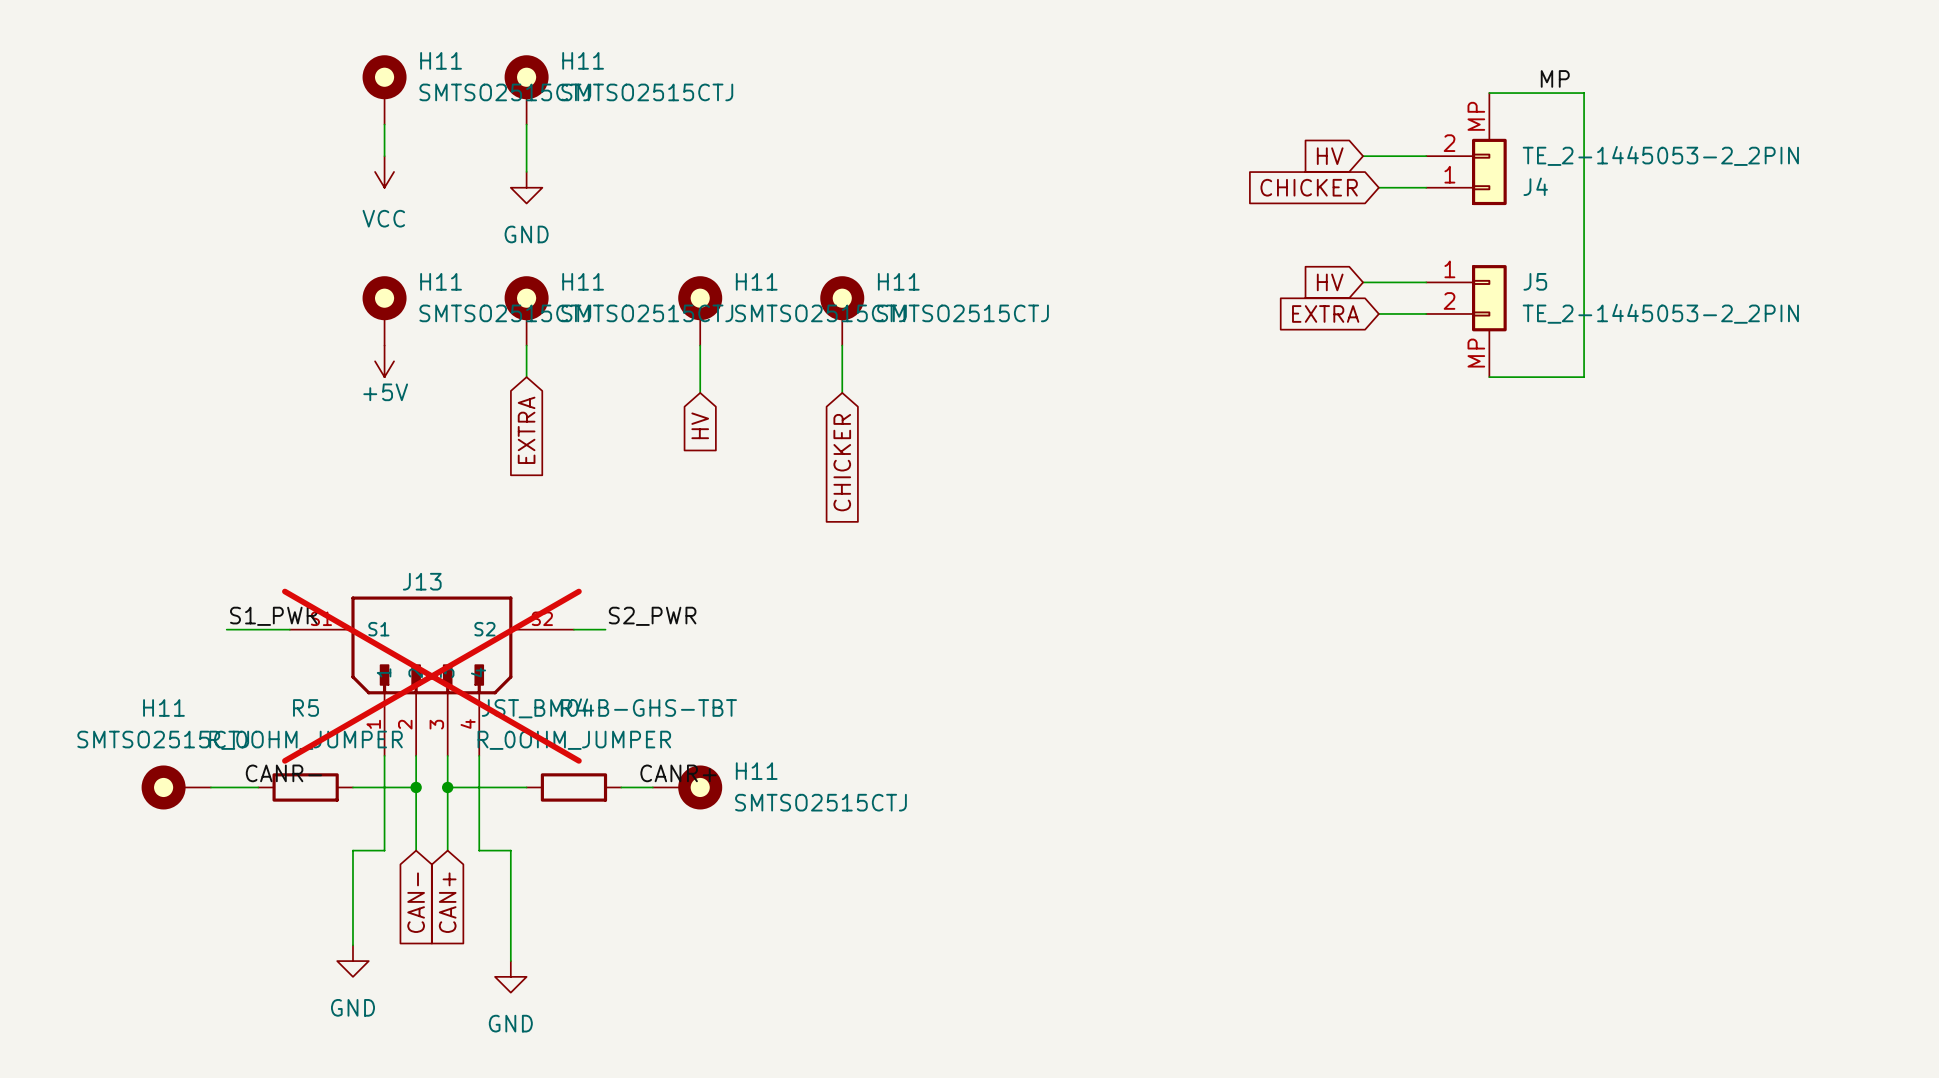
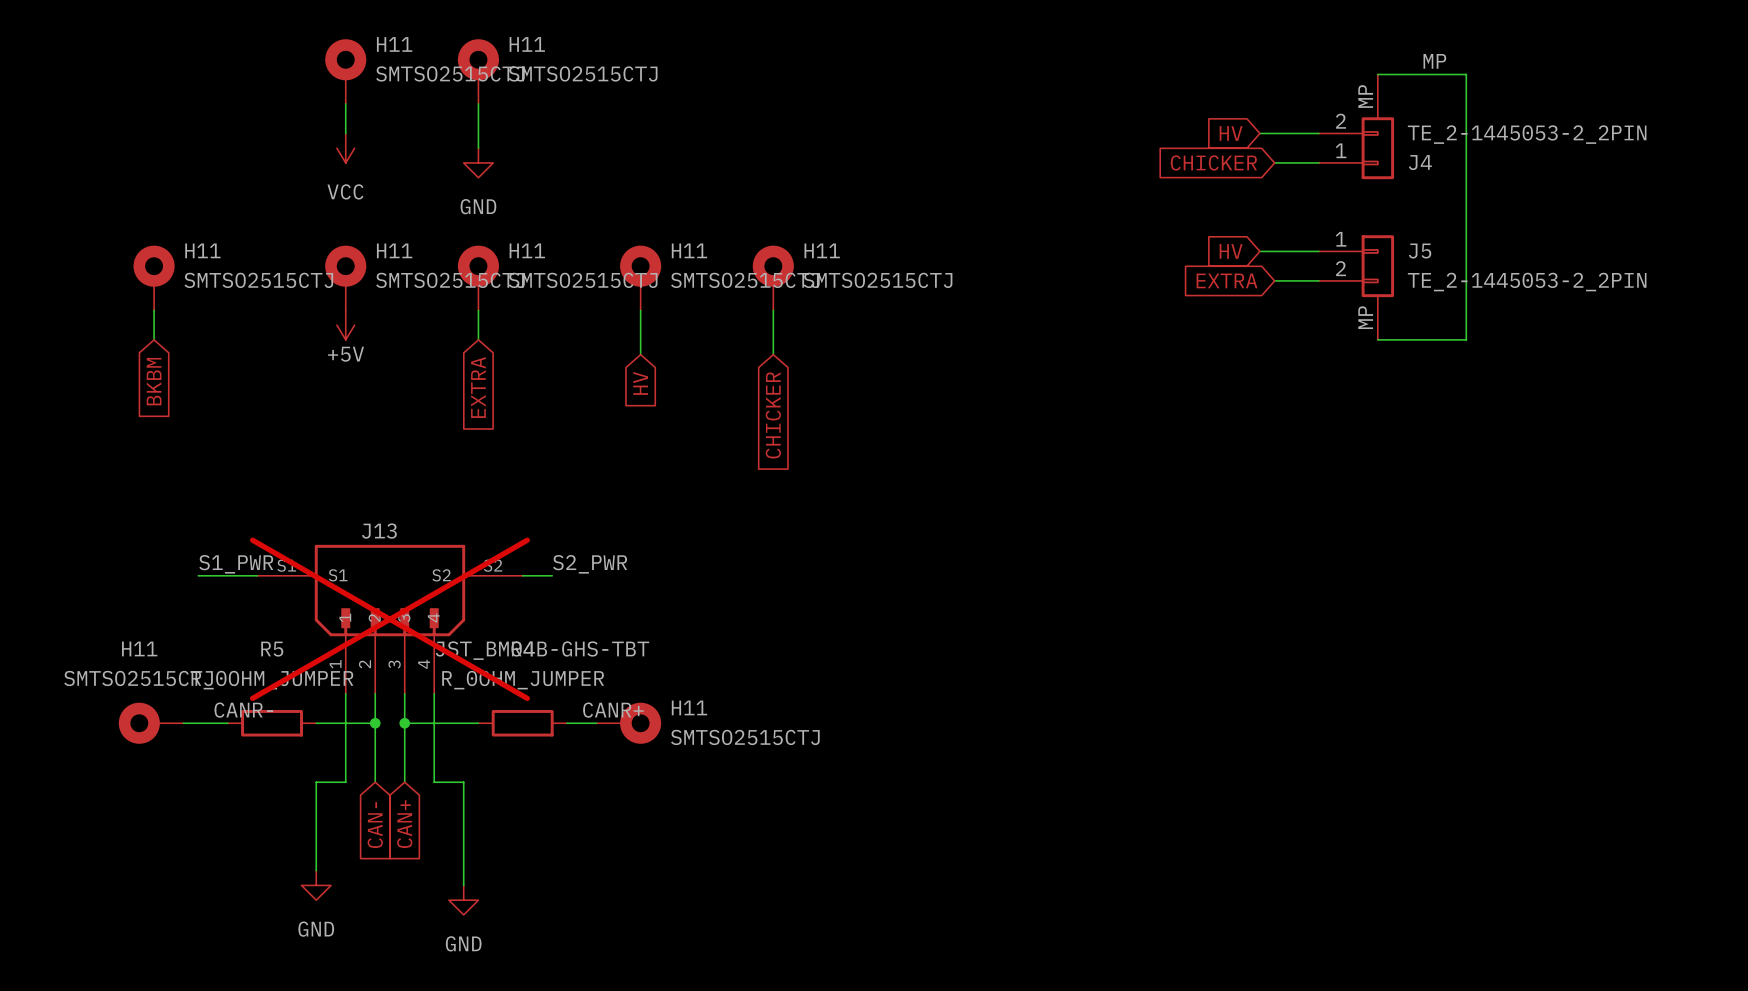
H11: none -> SMTSO2515CTJ (154, 278)
wire: none -> (154, 310) (154, 339)
global label: none -> BKBM (154, 381)

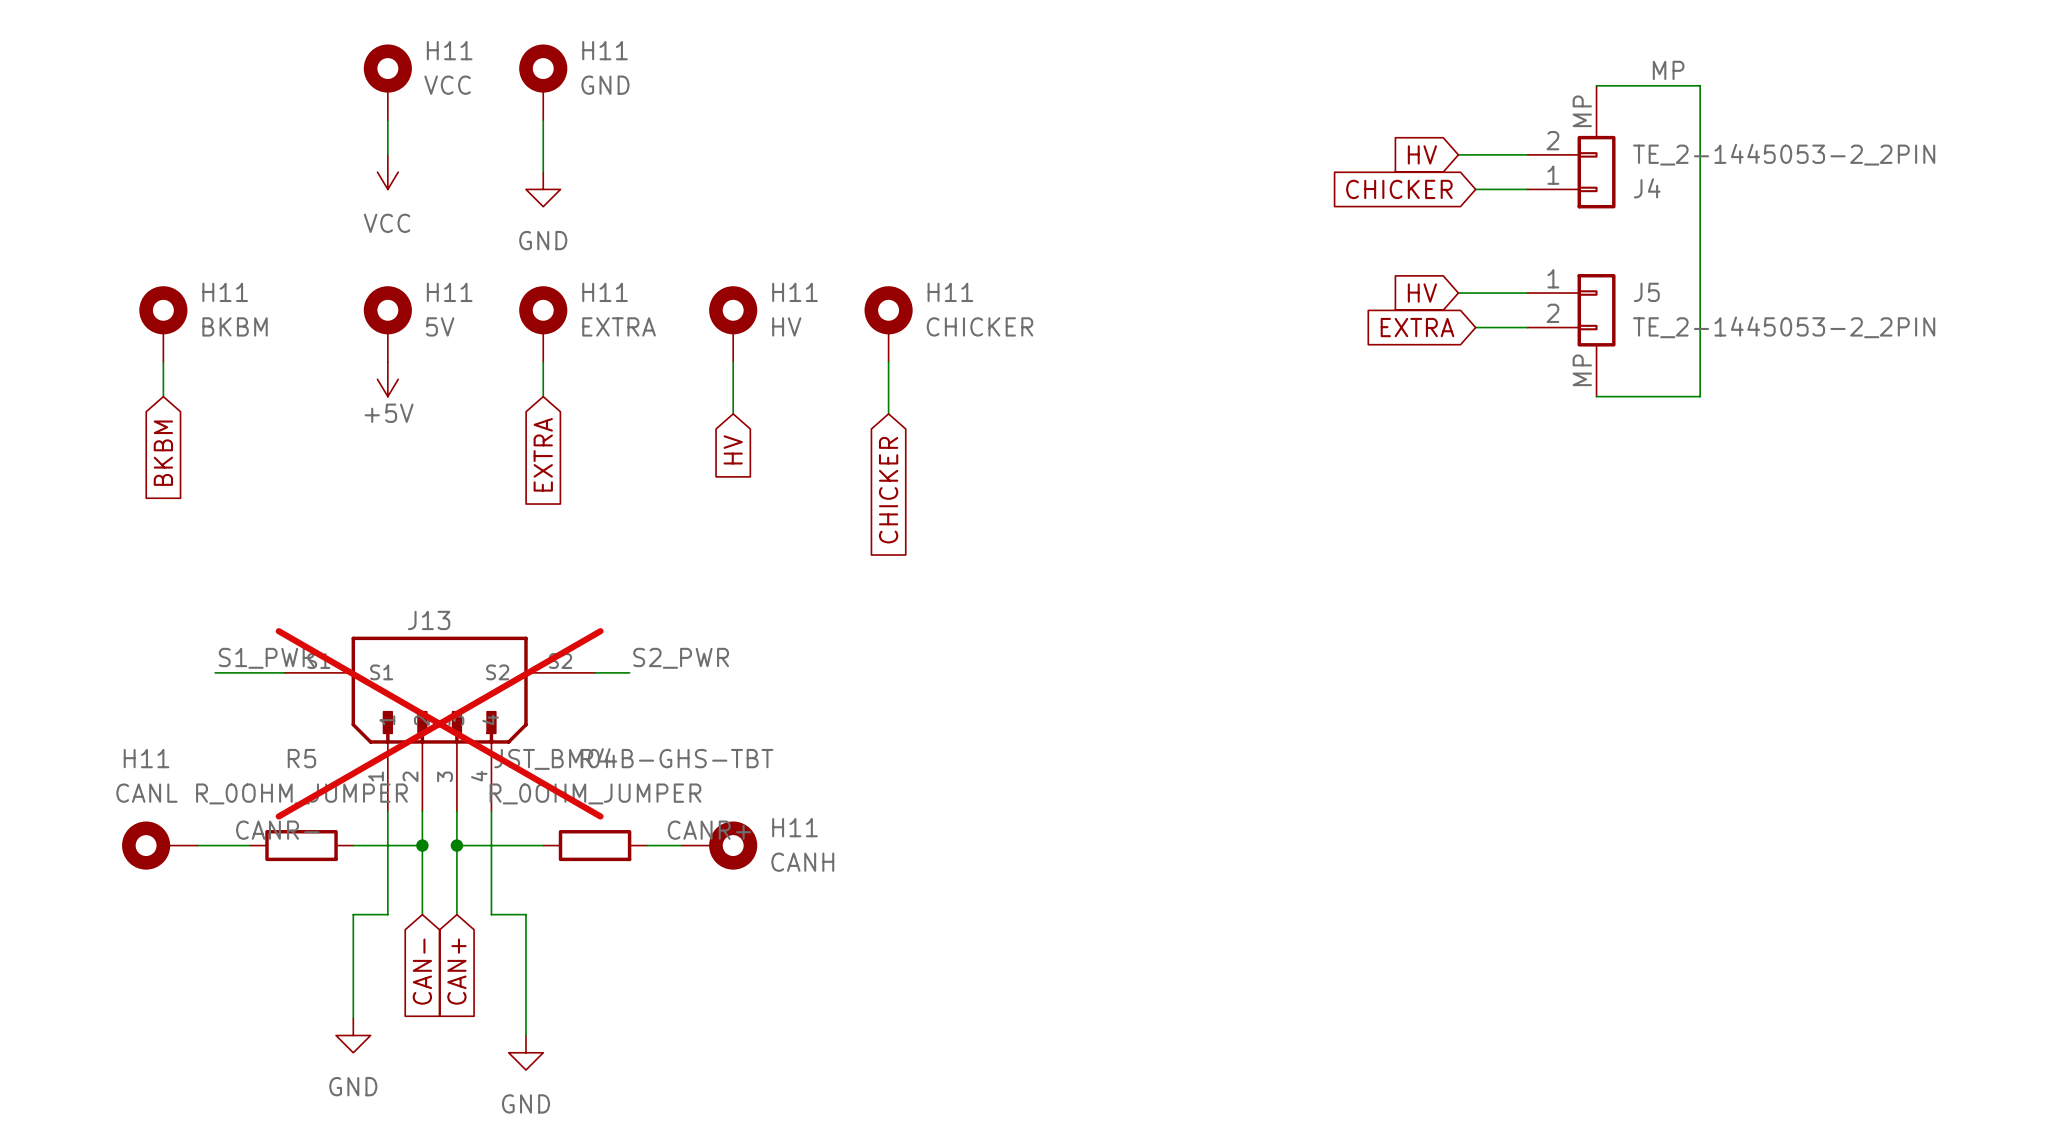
H11 value: SMTSO2515CTJ (450, 73) -> VCC (447, 85)
H11 value: SMTSO2515CTJ (583, 73) -> GND (605, 85)
H11 value: SMTSO2515CTJ (258, 280) -> BKBM (235, 326)
H11 value: SMTSO2515CTJ (450, 280) -> 5V (440, 326)
H11 value: SMTSO2515CTJ (583, 280) -> EXTRA (619, 326)
H11 value: SMTSO2515CTJ (745, 280) -> HV (786, 326)
H11 value: SMTSO2515CTJ (878, 280) -> CHICKER (979, 326)
H11 value: SMTSO2515CTJ (138, 678) -> CANL (146, 793)
H11 value: SMTSO2515CTJ (745, 737) -> CANH (802, 862)

